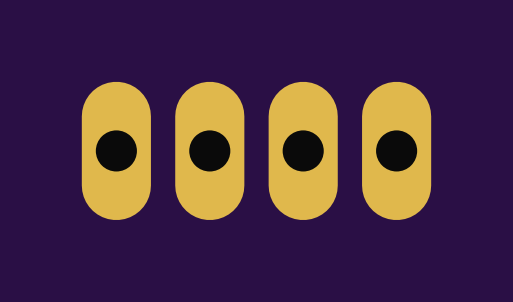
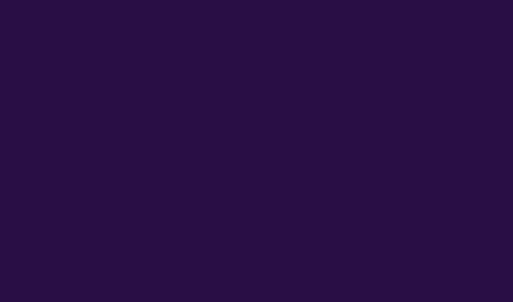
part: (256, 150) -> none

